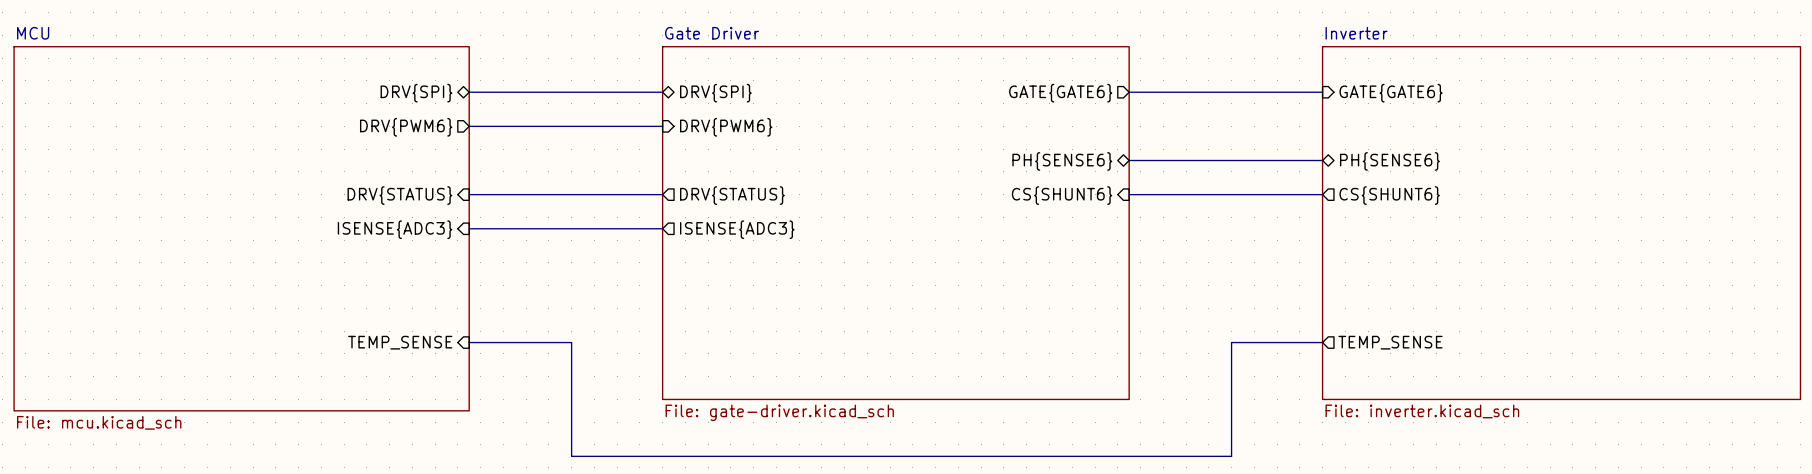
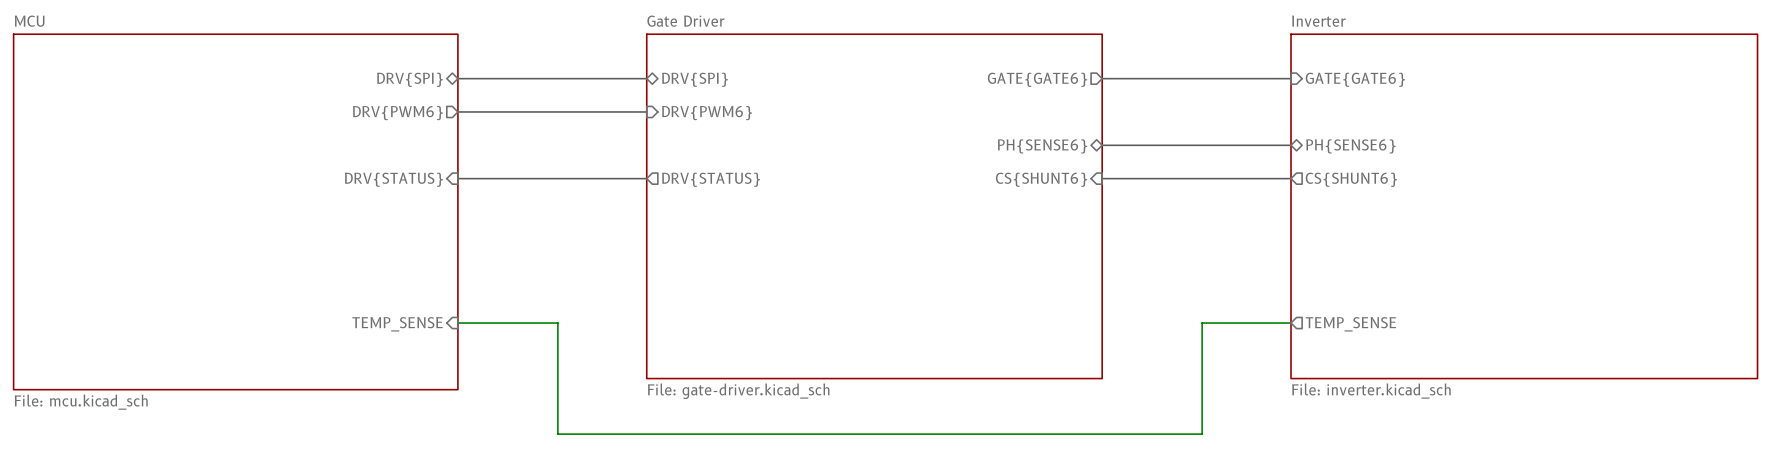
bus: (469, 228) (662, 228) -> none
sheet pin: ISENSE{ADC3} (395, 229) -> none
sheet pin: ISENSE{ADC3} (737, 229) -> none

